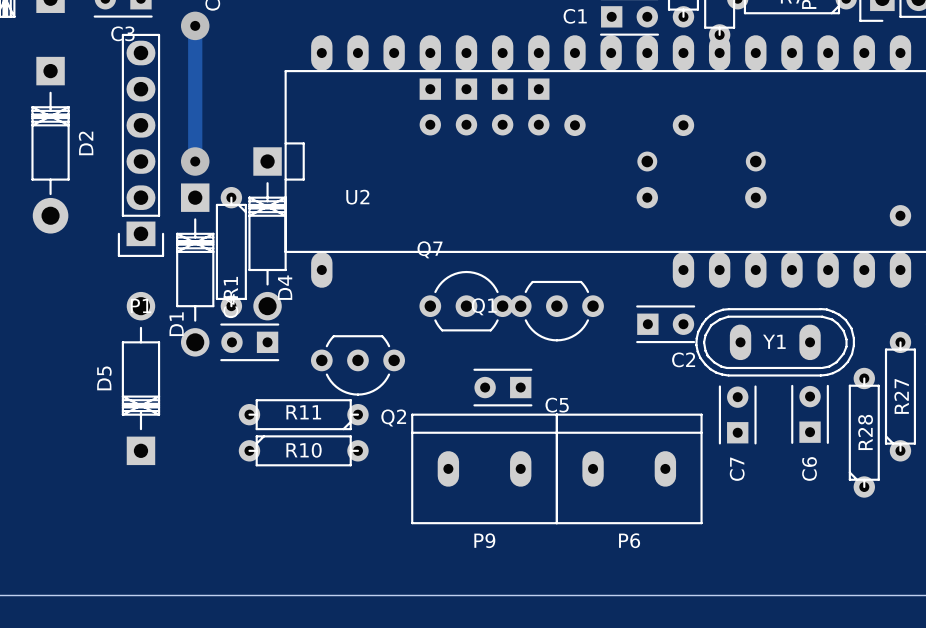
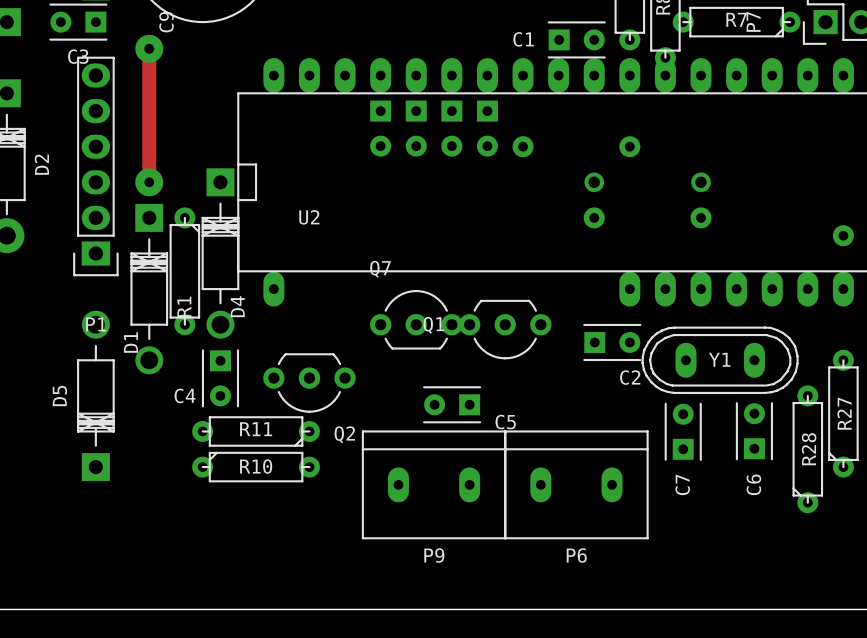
C4 rotation: 0° (249, 342) -> 90° counterclockwise (220, 378)

